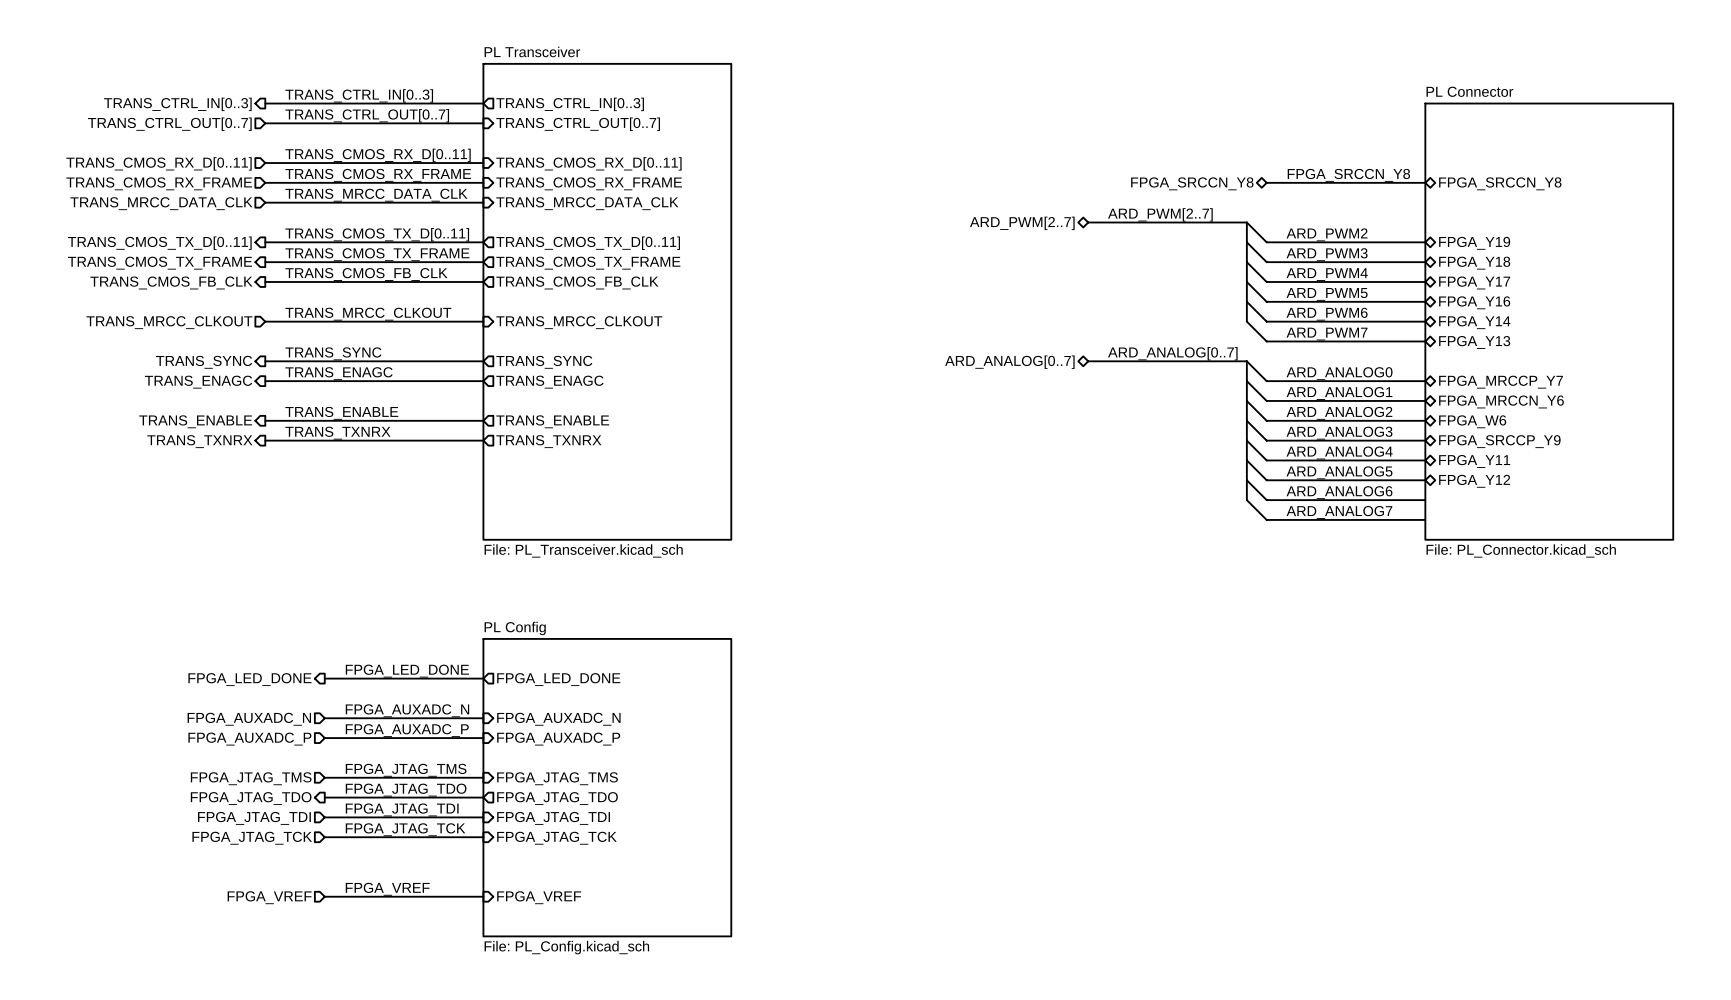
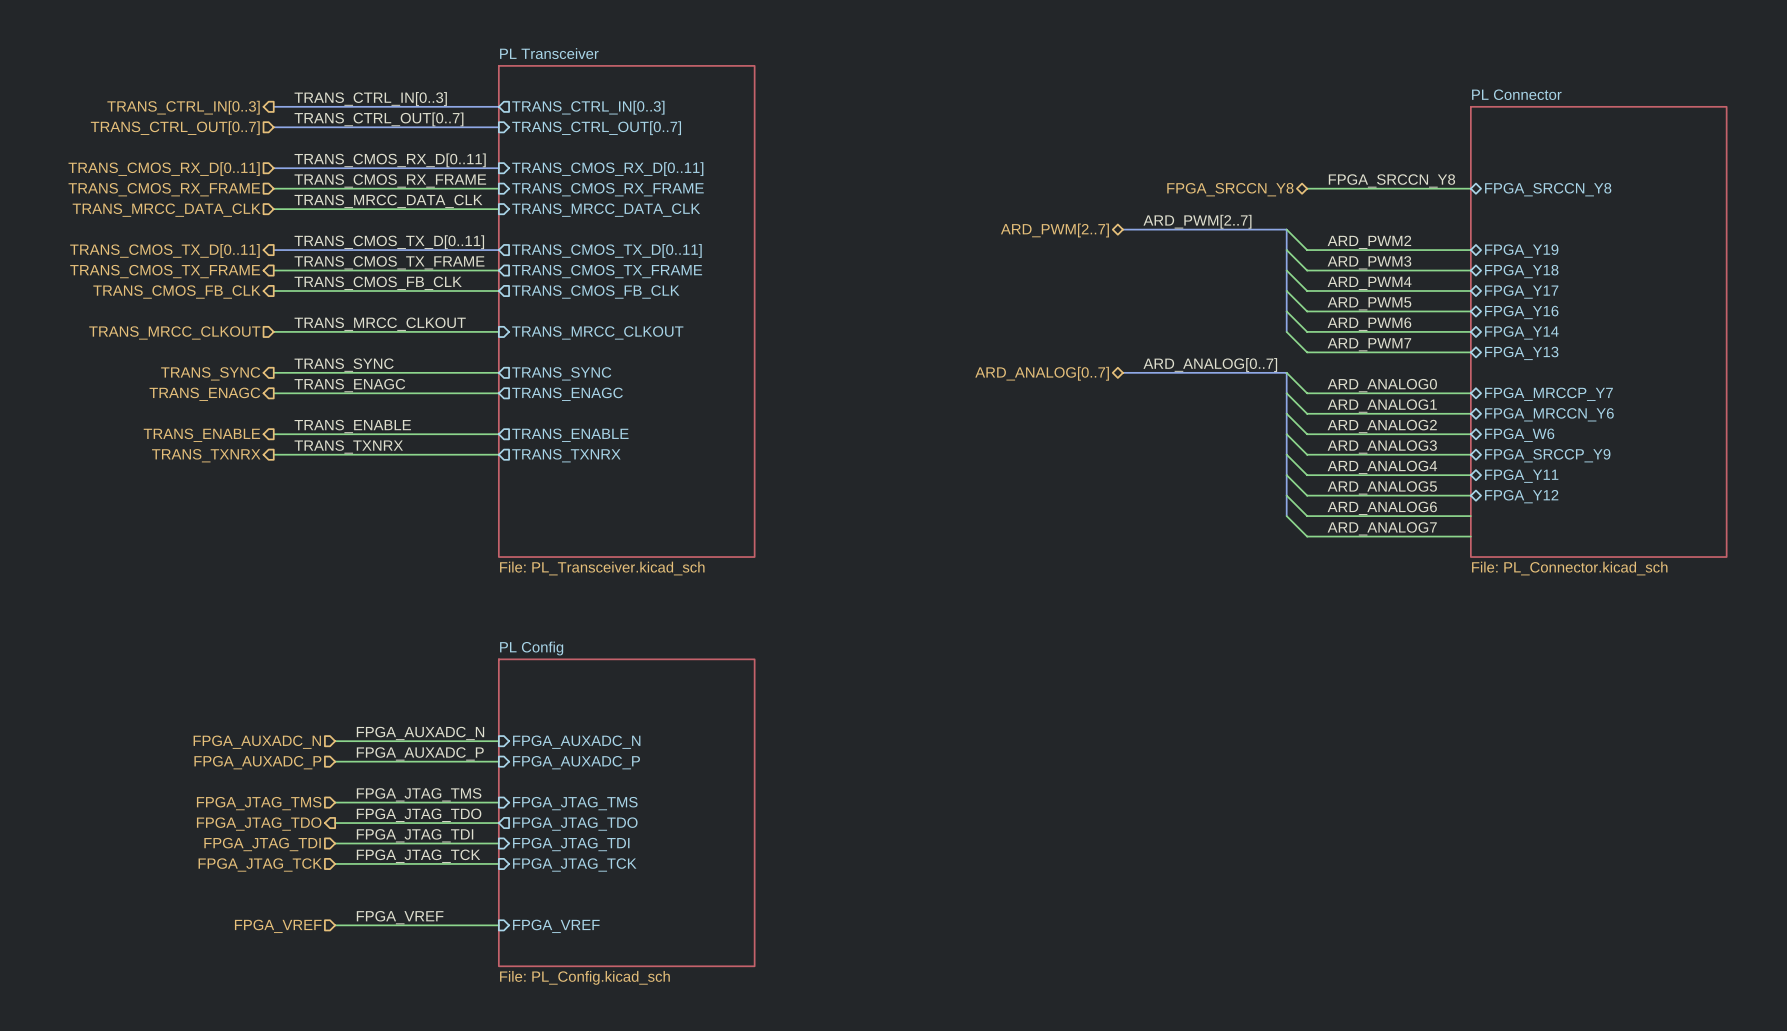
label: FPGA_LED_DONE (407, 671) -> none
wire: (324, 678) (483, 678) -> none
hierarchical label: FPGA_LED_DONE (249, 679) -> none
sheet pin: FPGA_LED_DONE (558, 679) -> none

